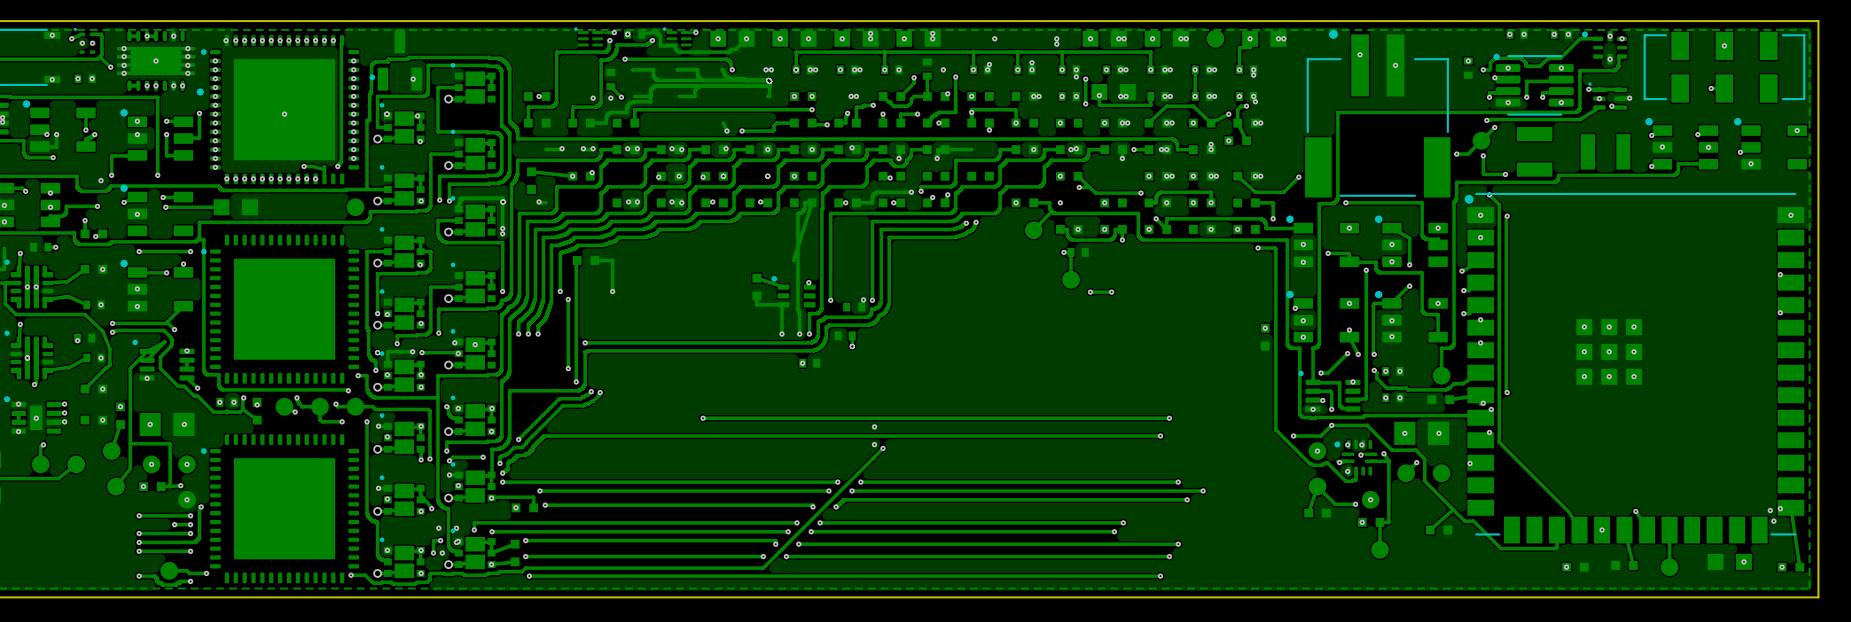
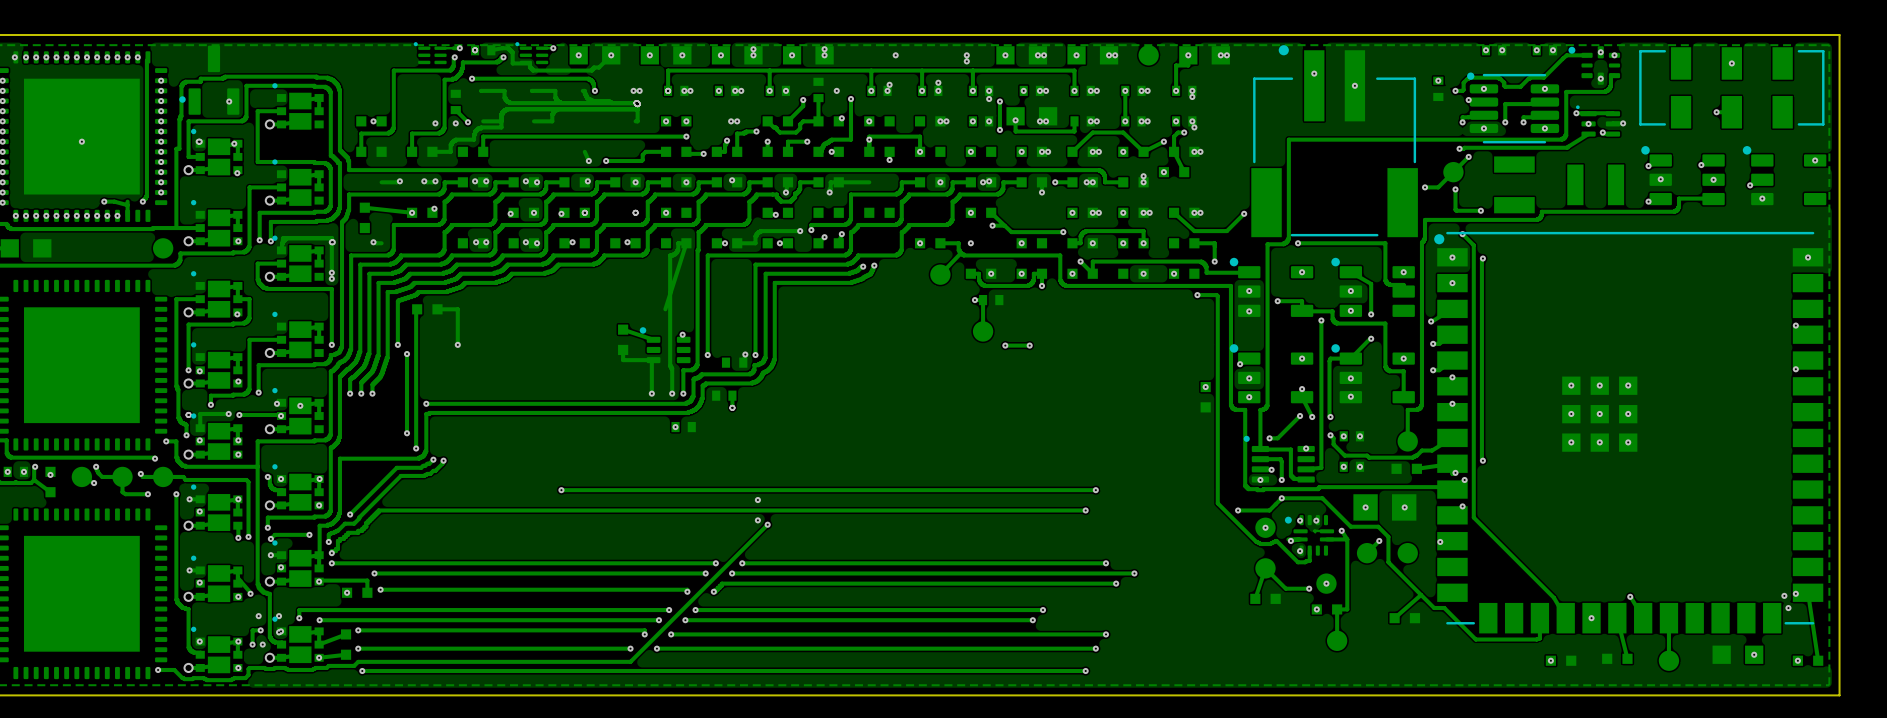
via: (1360, 455) -> none

